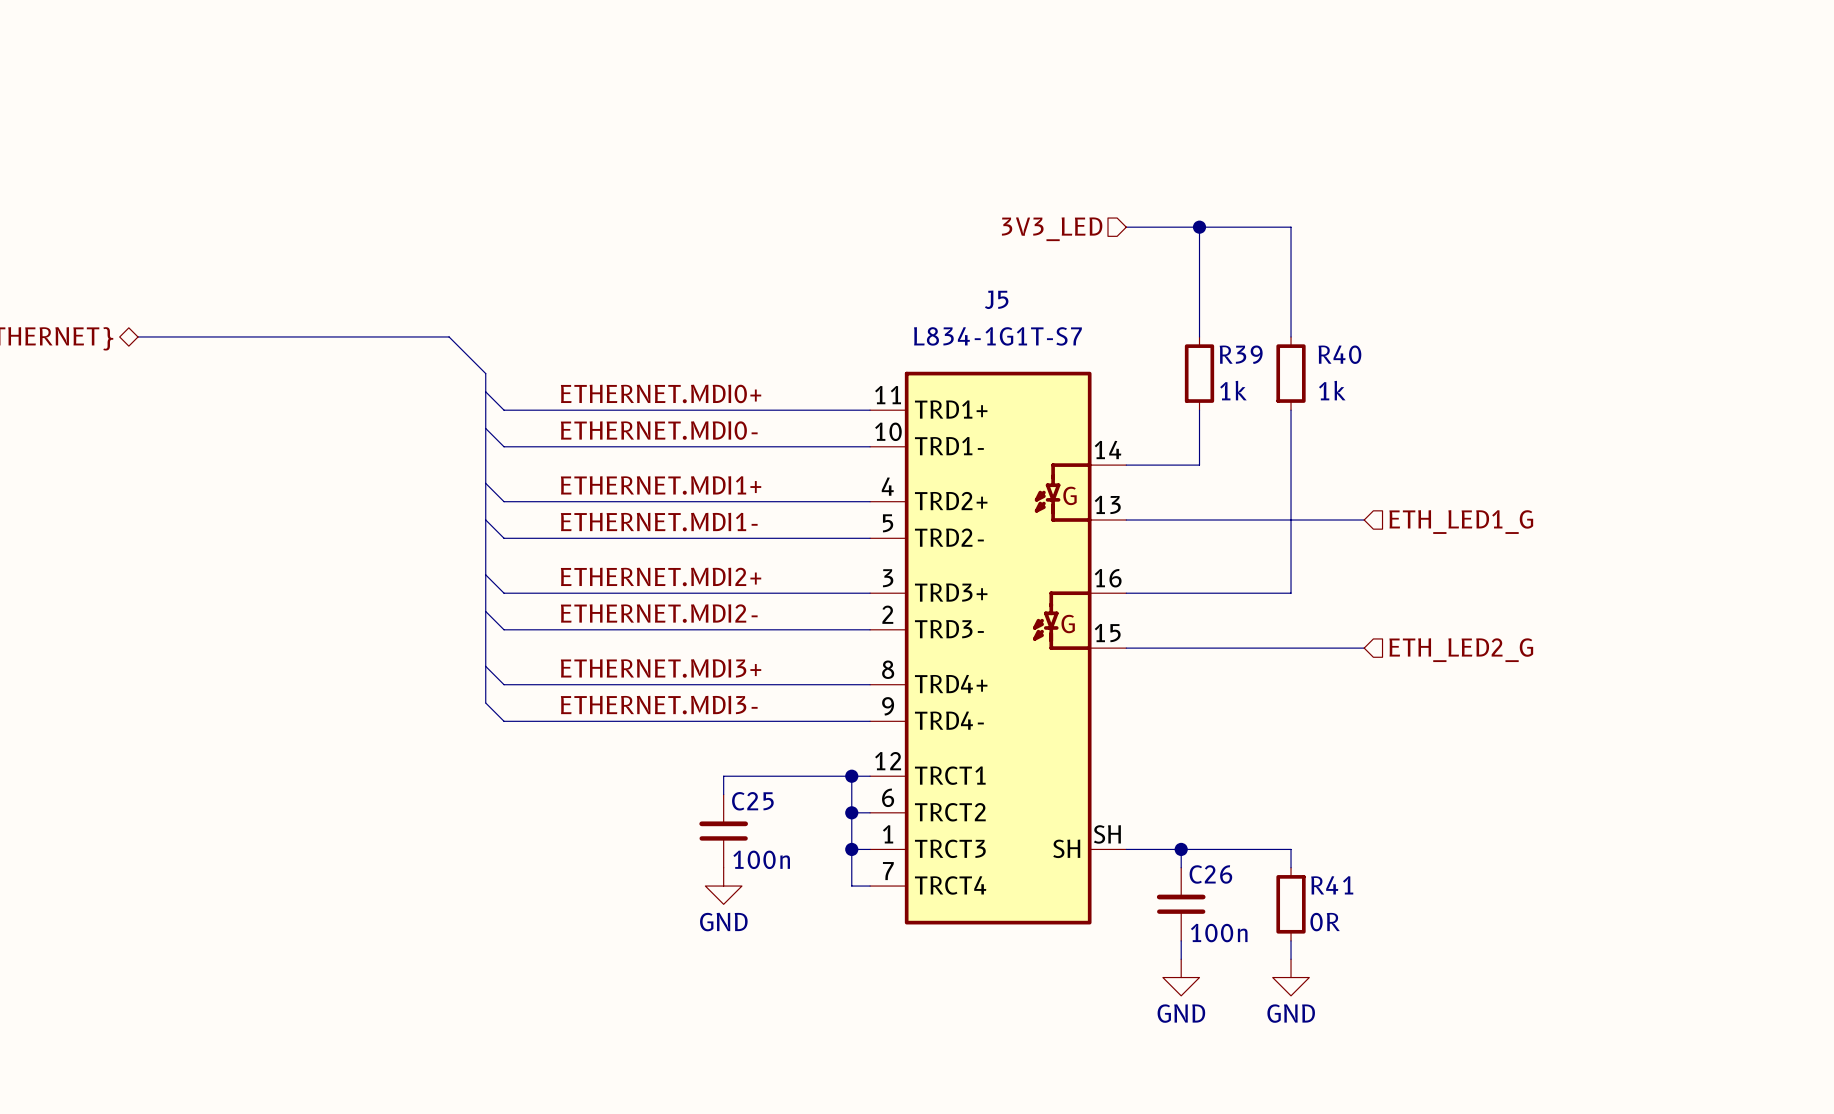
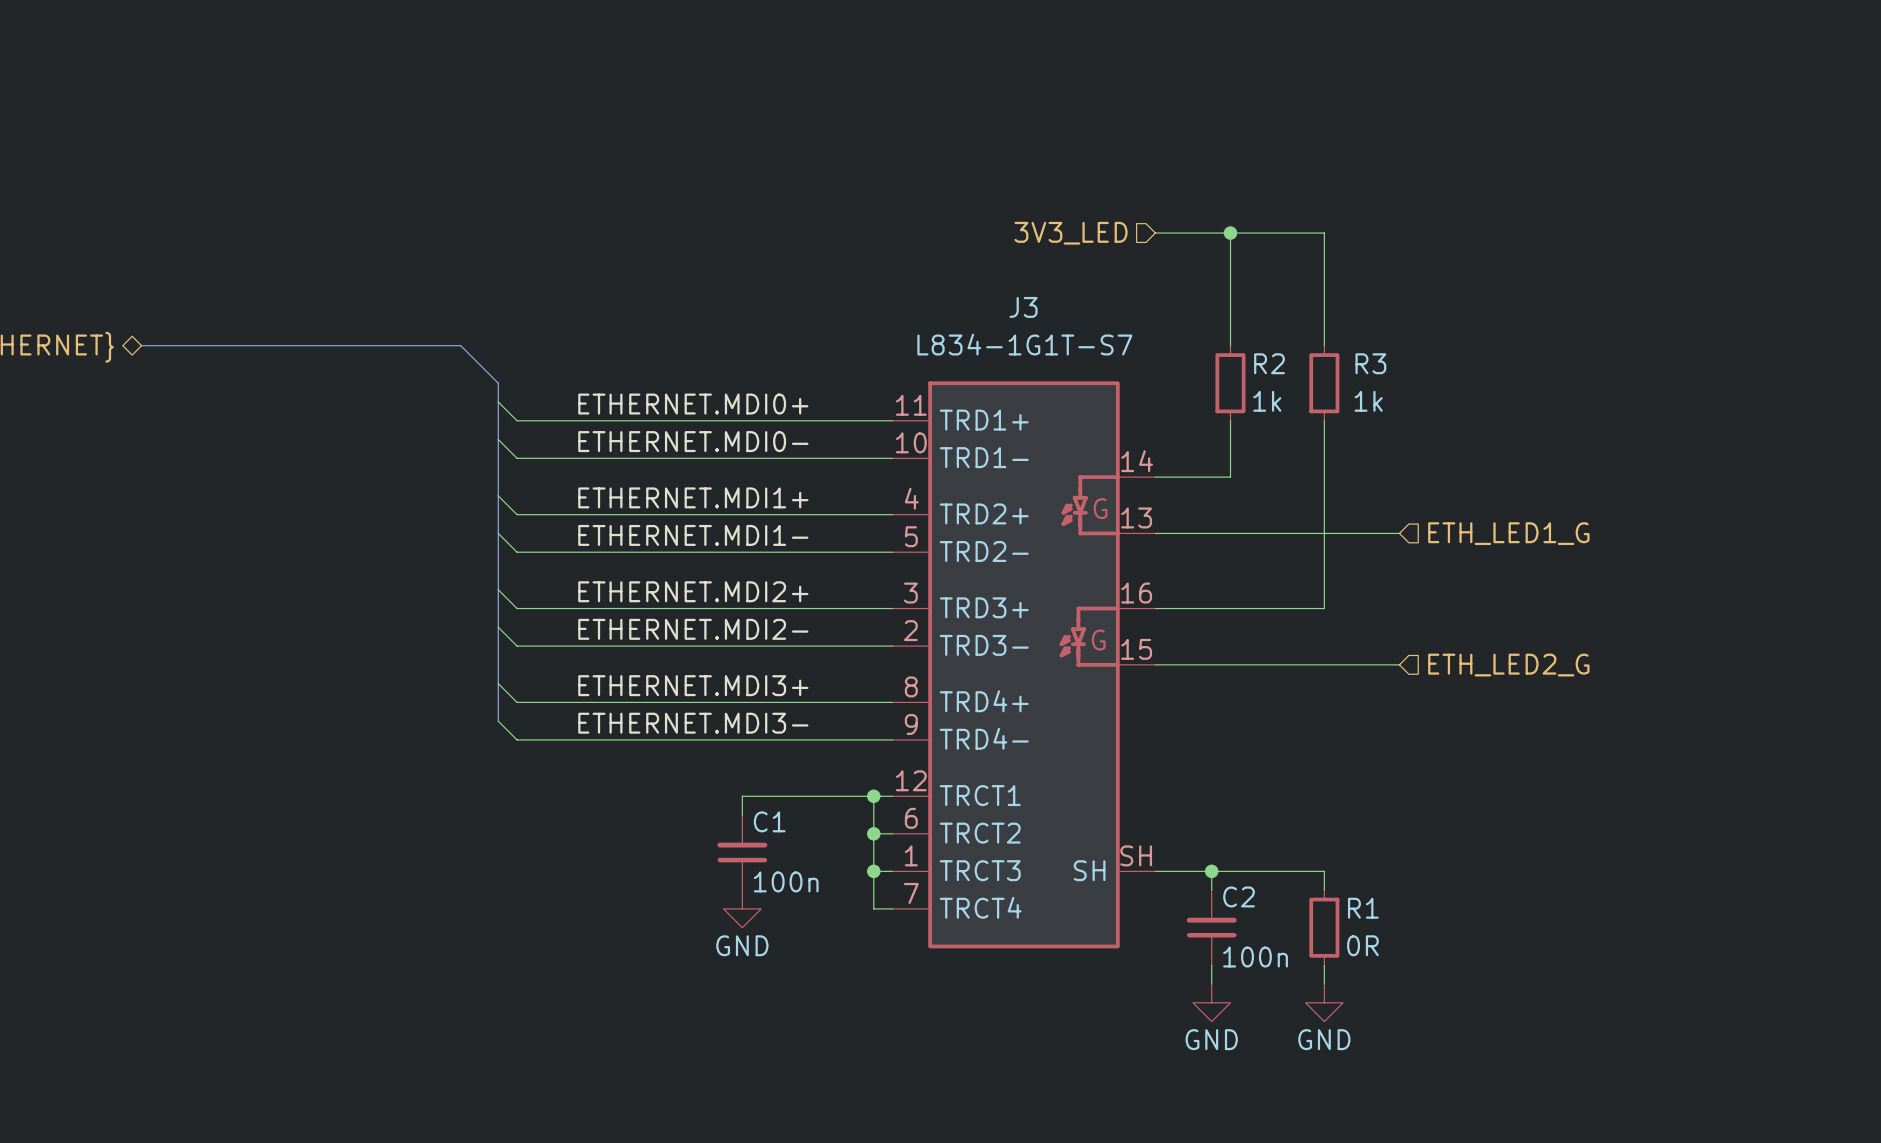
J5 name: J5 (996, 299) -> J3 (1023, 307)
R39 name: R39 (1241, 354) -> R2 (1269, 363)
R40 name: R40 (1339, 354) -> R3 (1370, 363)
C25 name: C25 (752, 801) -> C1 (769, 821)
C26 name: C26 (1210, 874) -> C2 (1239, 896)
R41 name: R41 (1332, 885) -> R1 (1363, 908)

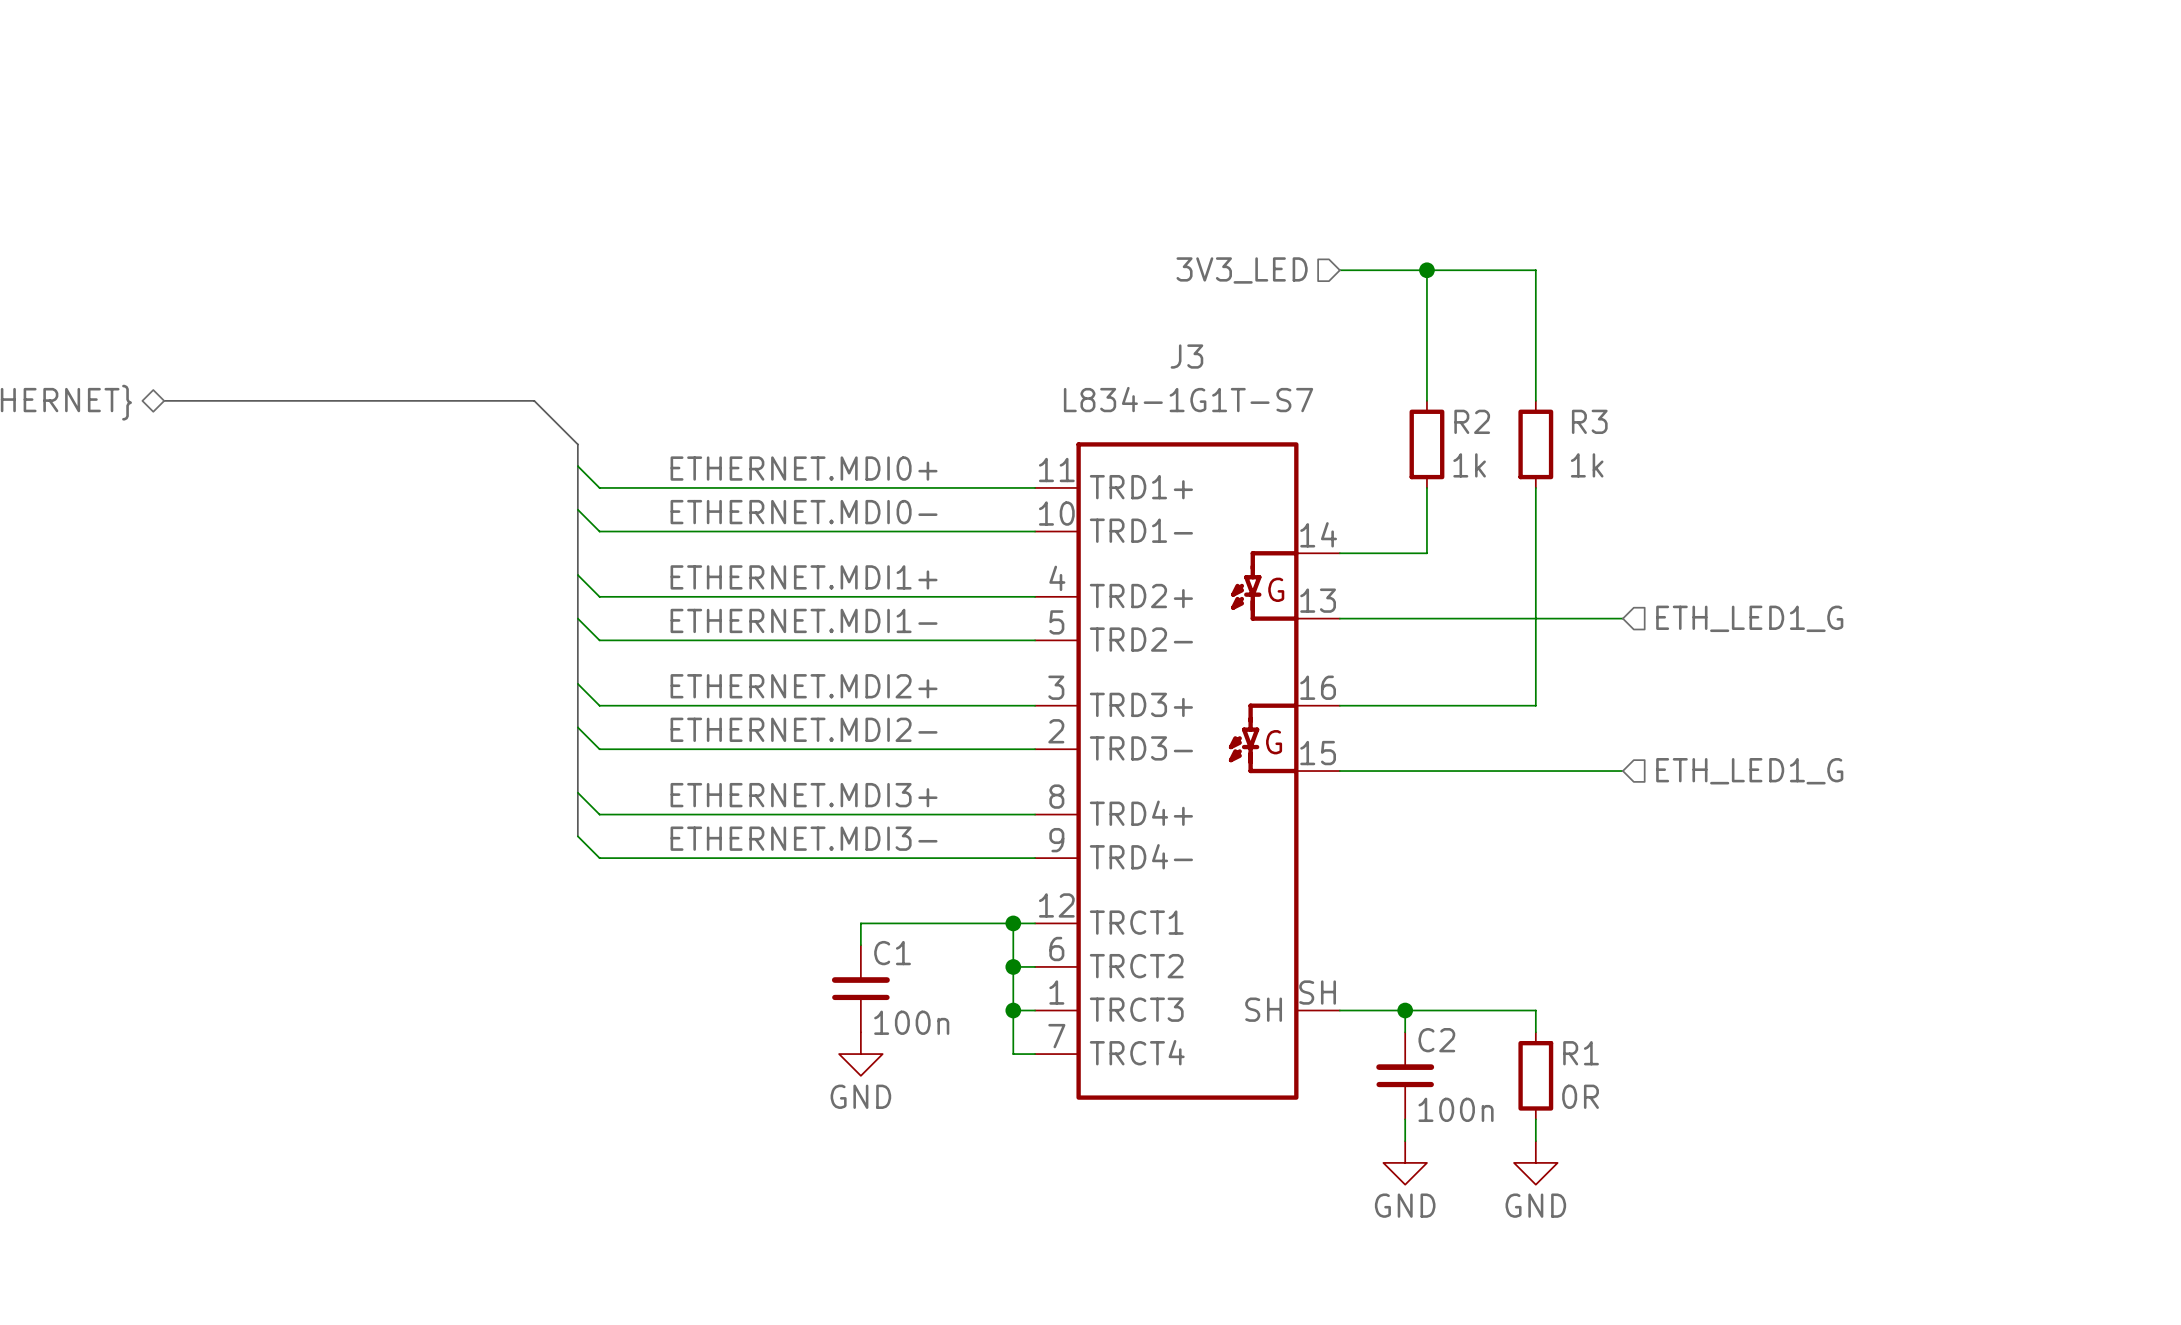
hierarchical label: ETH_LED2_G (1508, 665) -> ETH_LED1_G (1749, 771)

